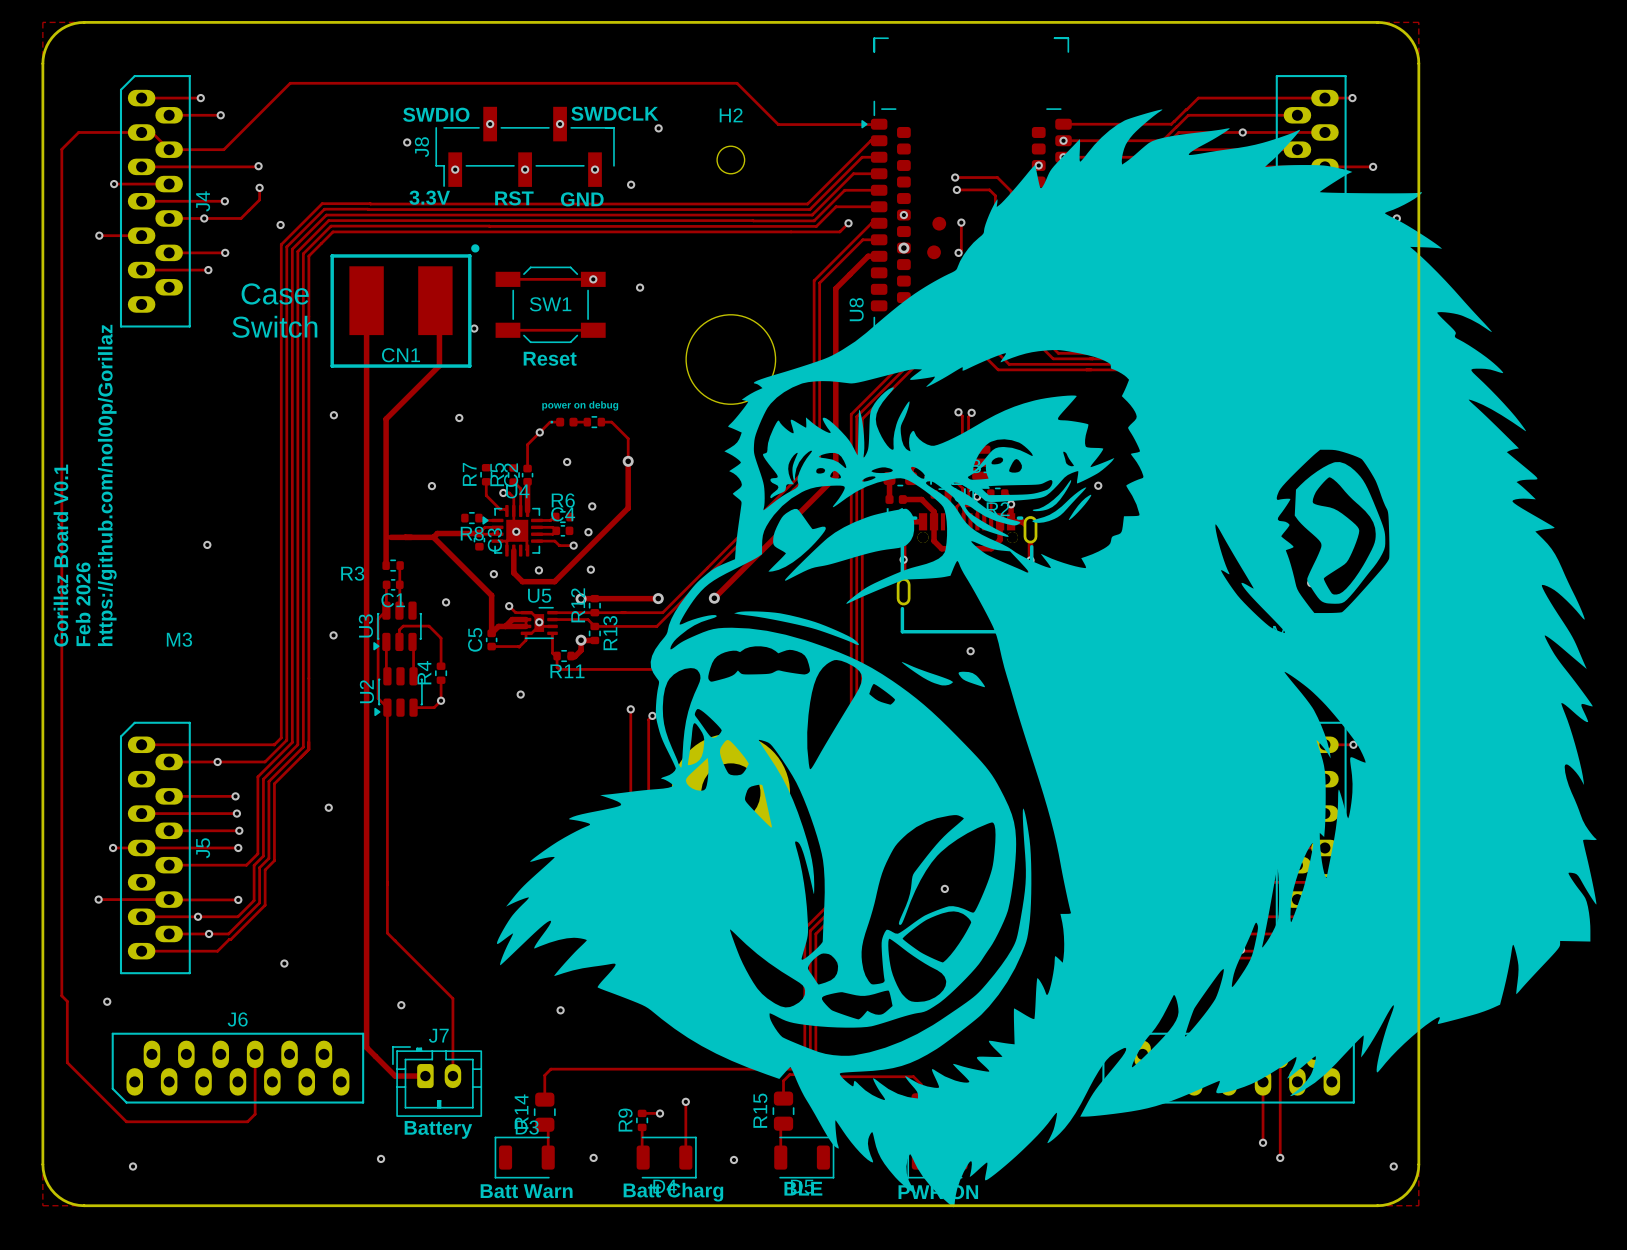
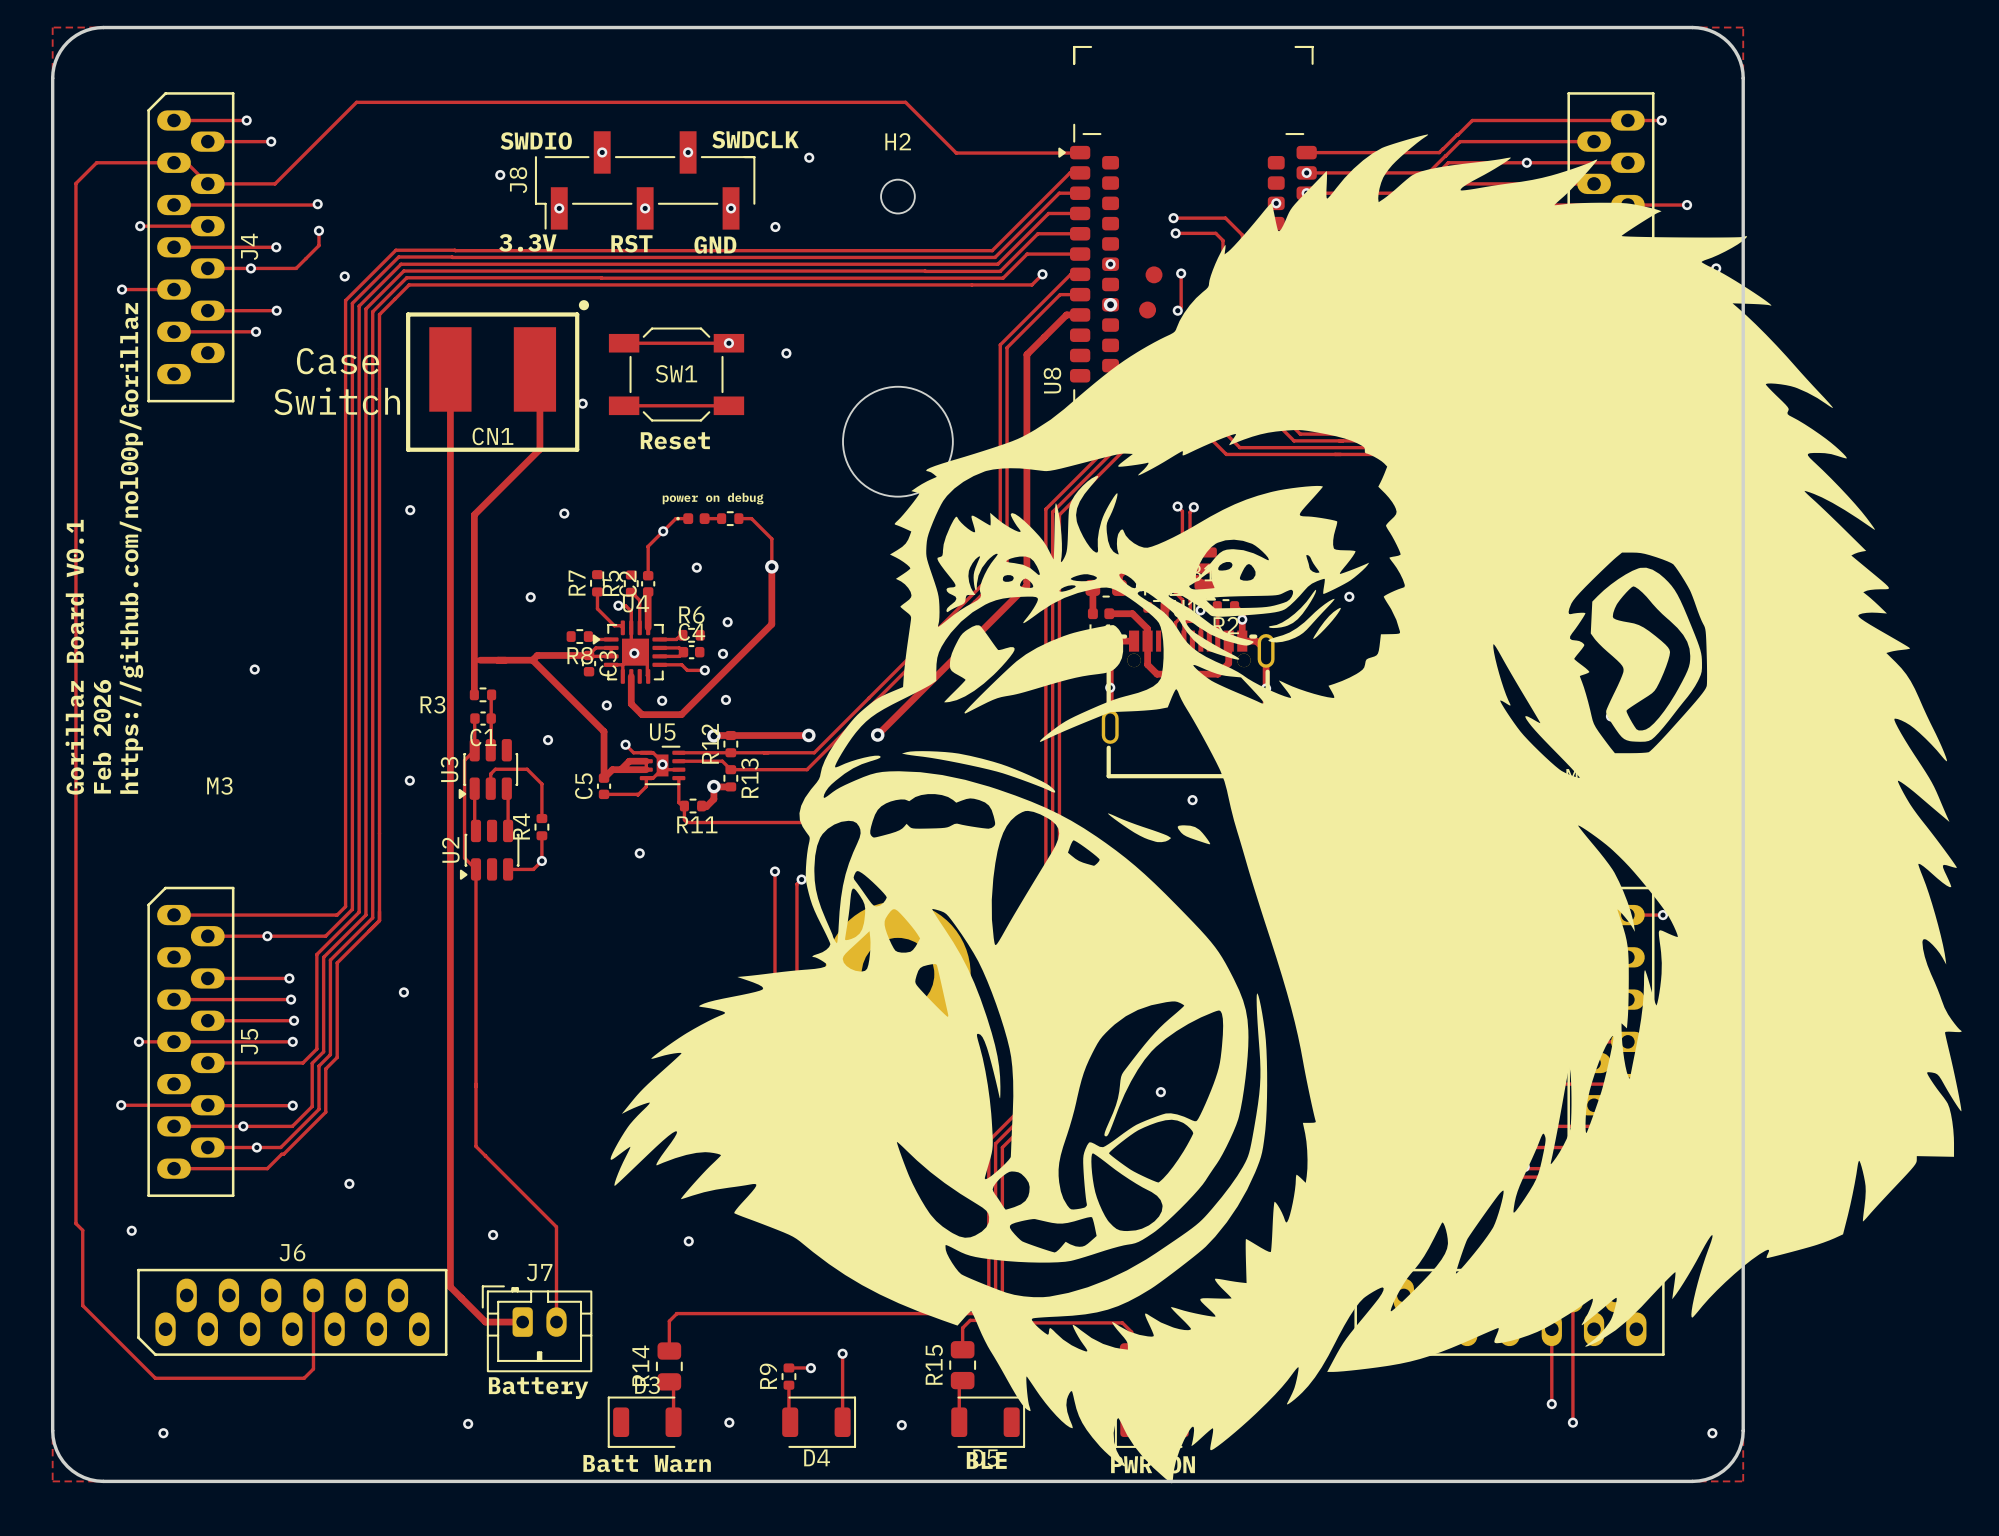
text: Batt Charg (673, 1192) -> none

